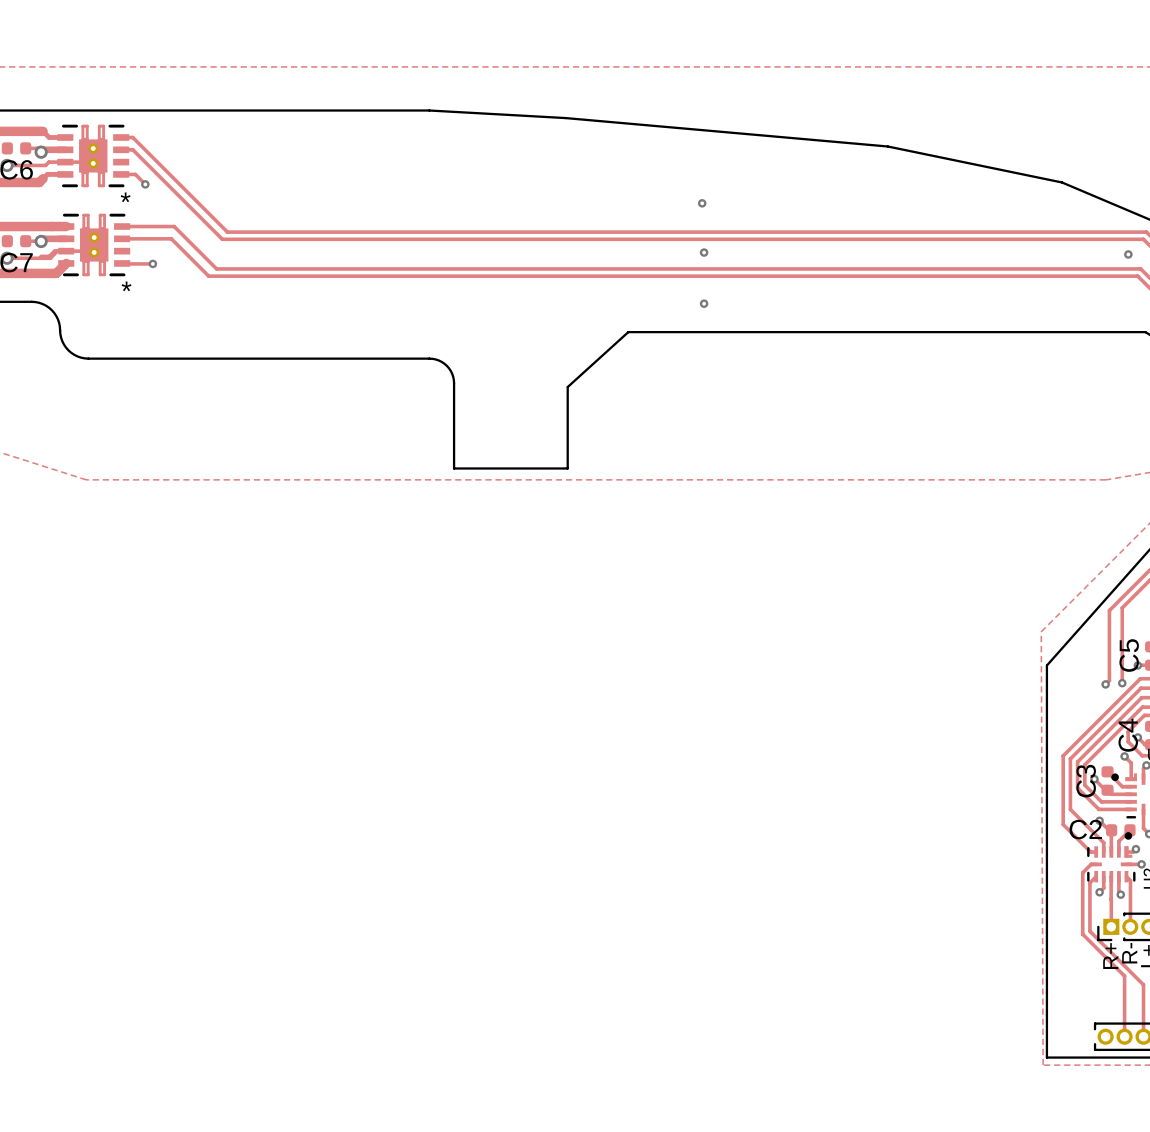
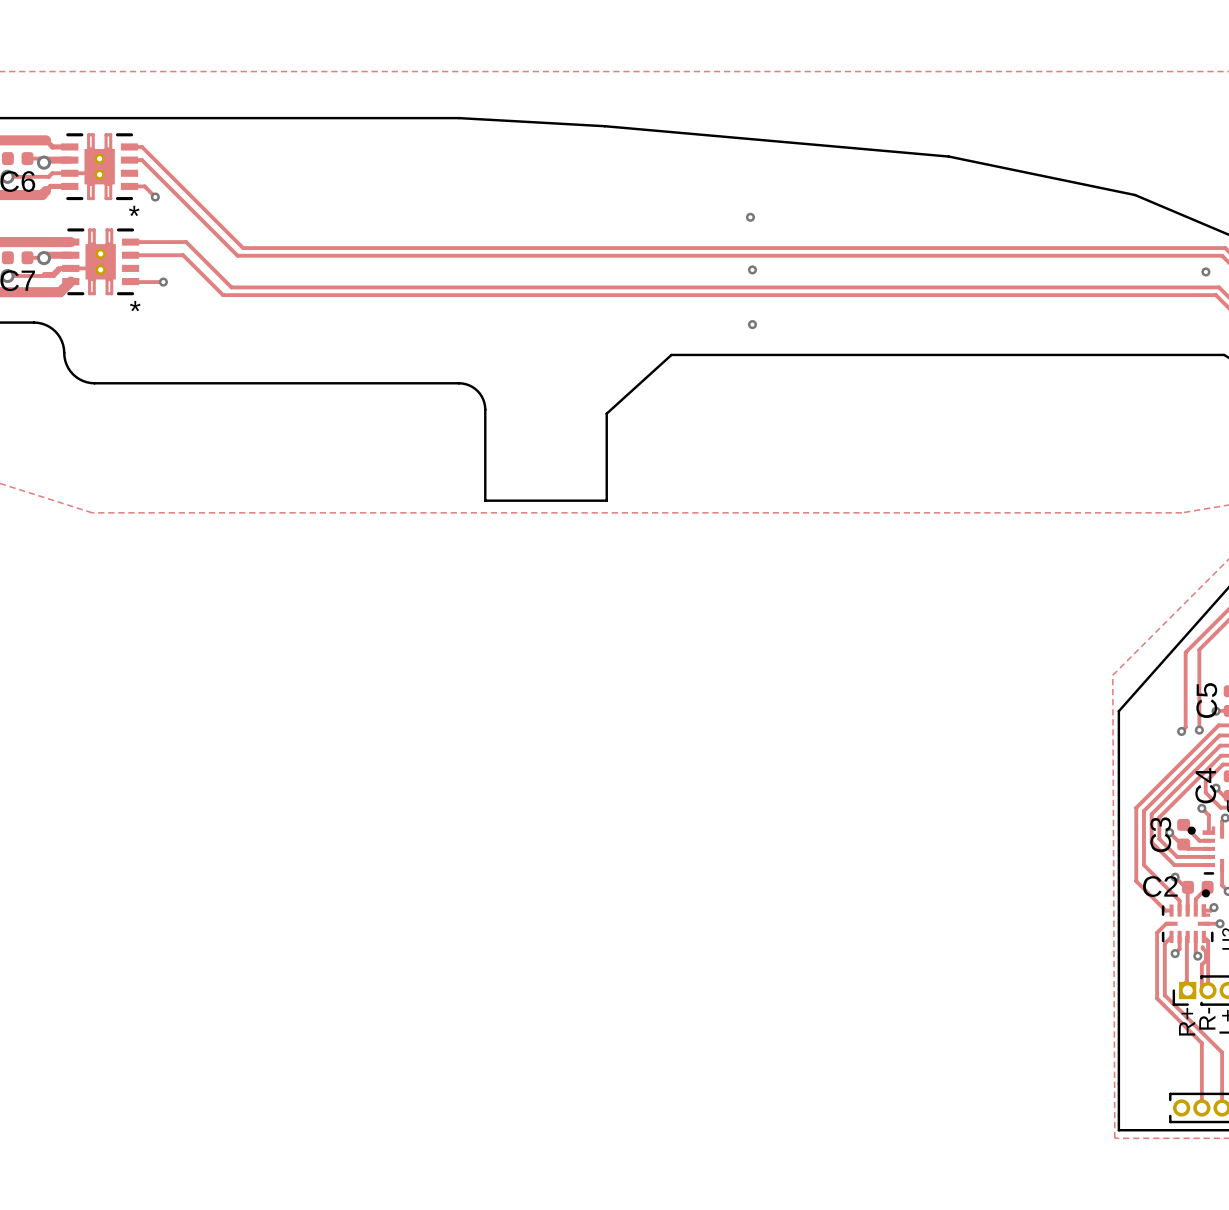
track: (1111, 876) (1111, 899) -> (1187, 937) (1186, 981) (1181, 986)
track: none -> (1202, 947) (1205, 951) (1205, 960) (1201, 964) (1201, 986)
track: (1111, 899) (1111, 926) -> none

